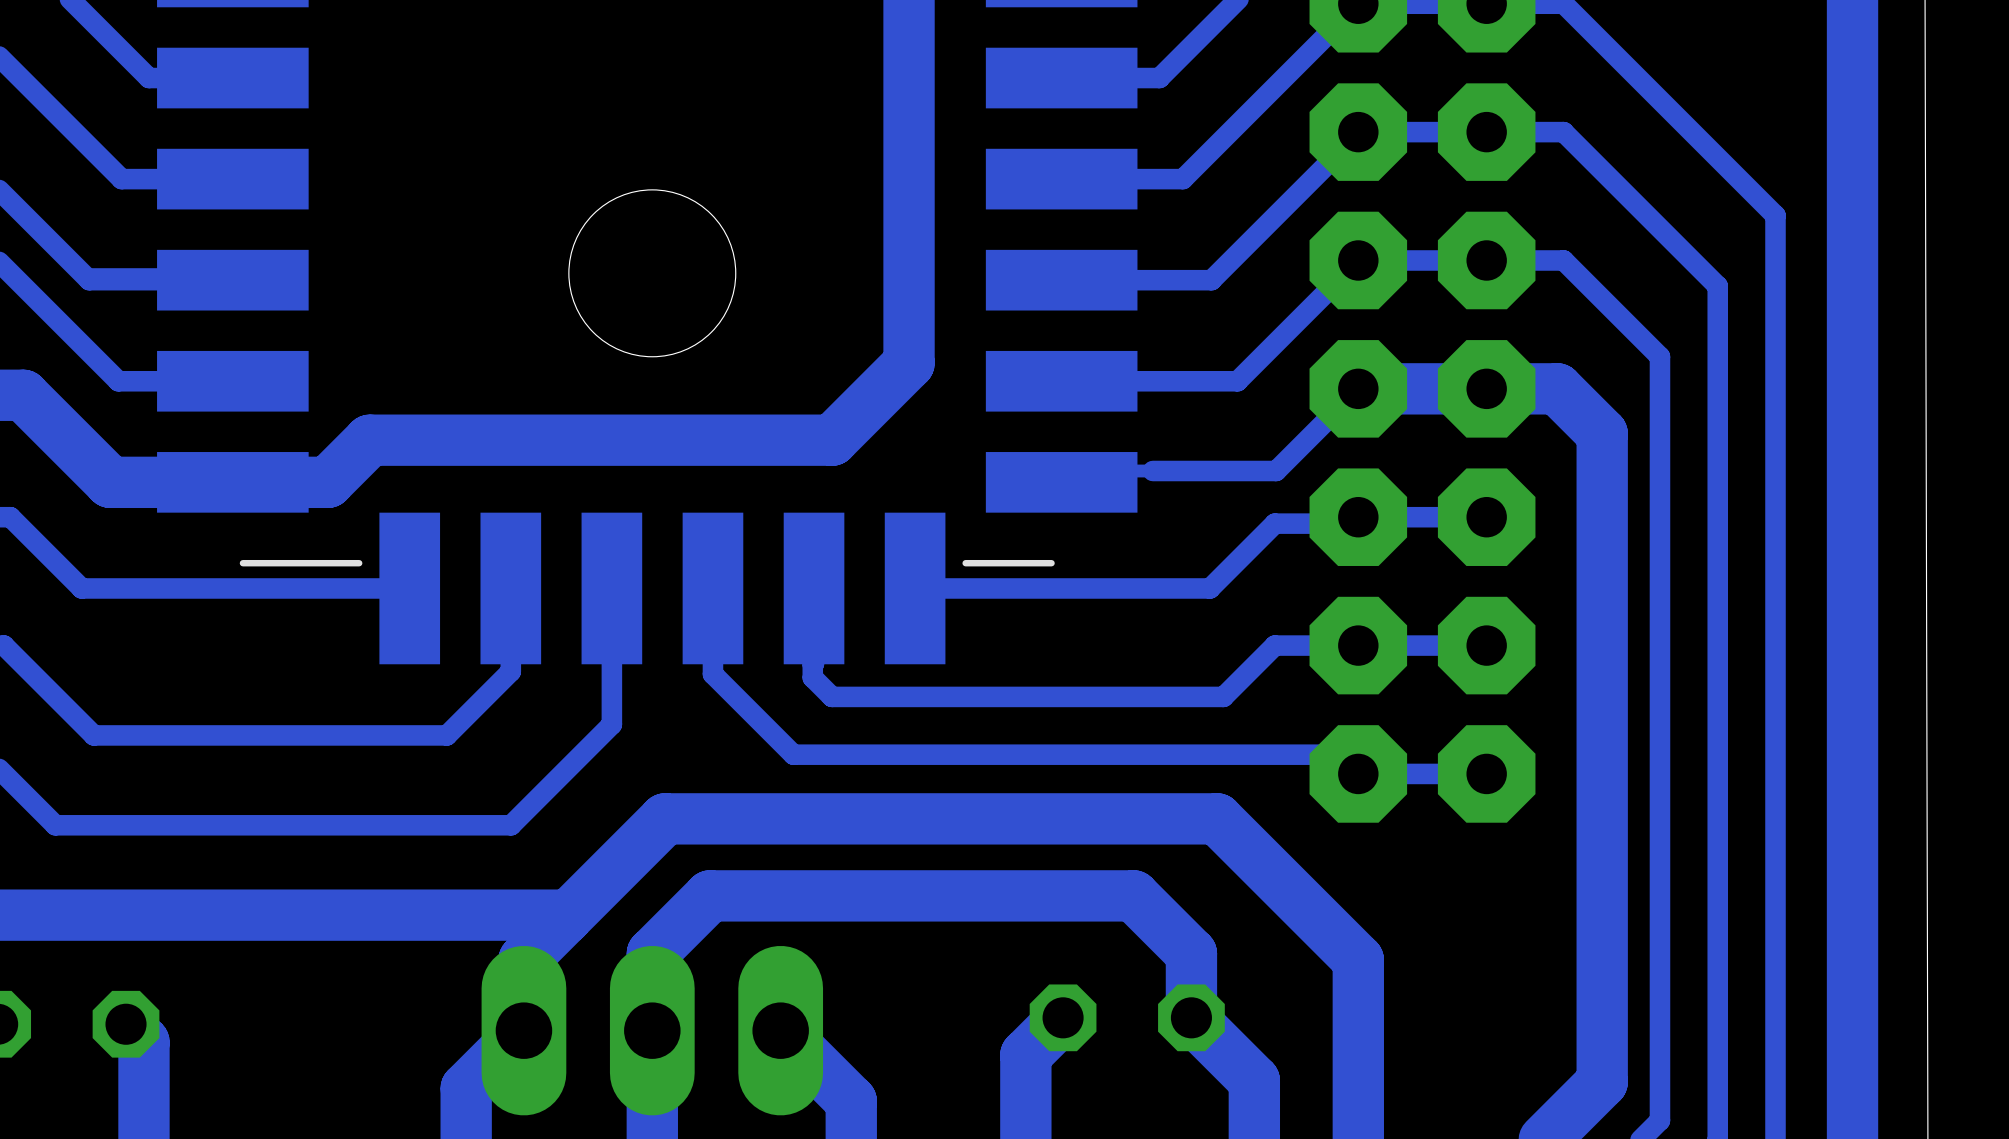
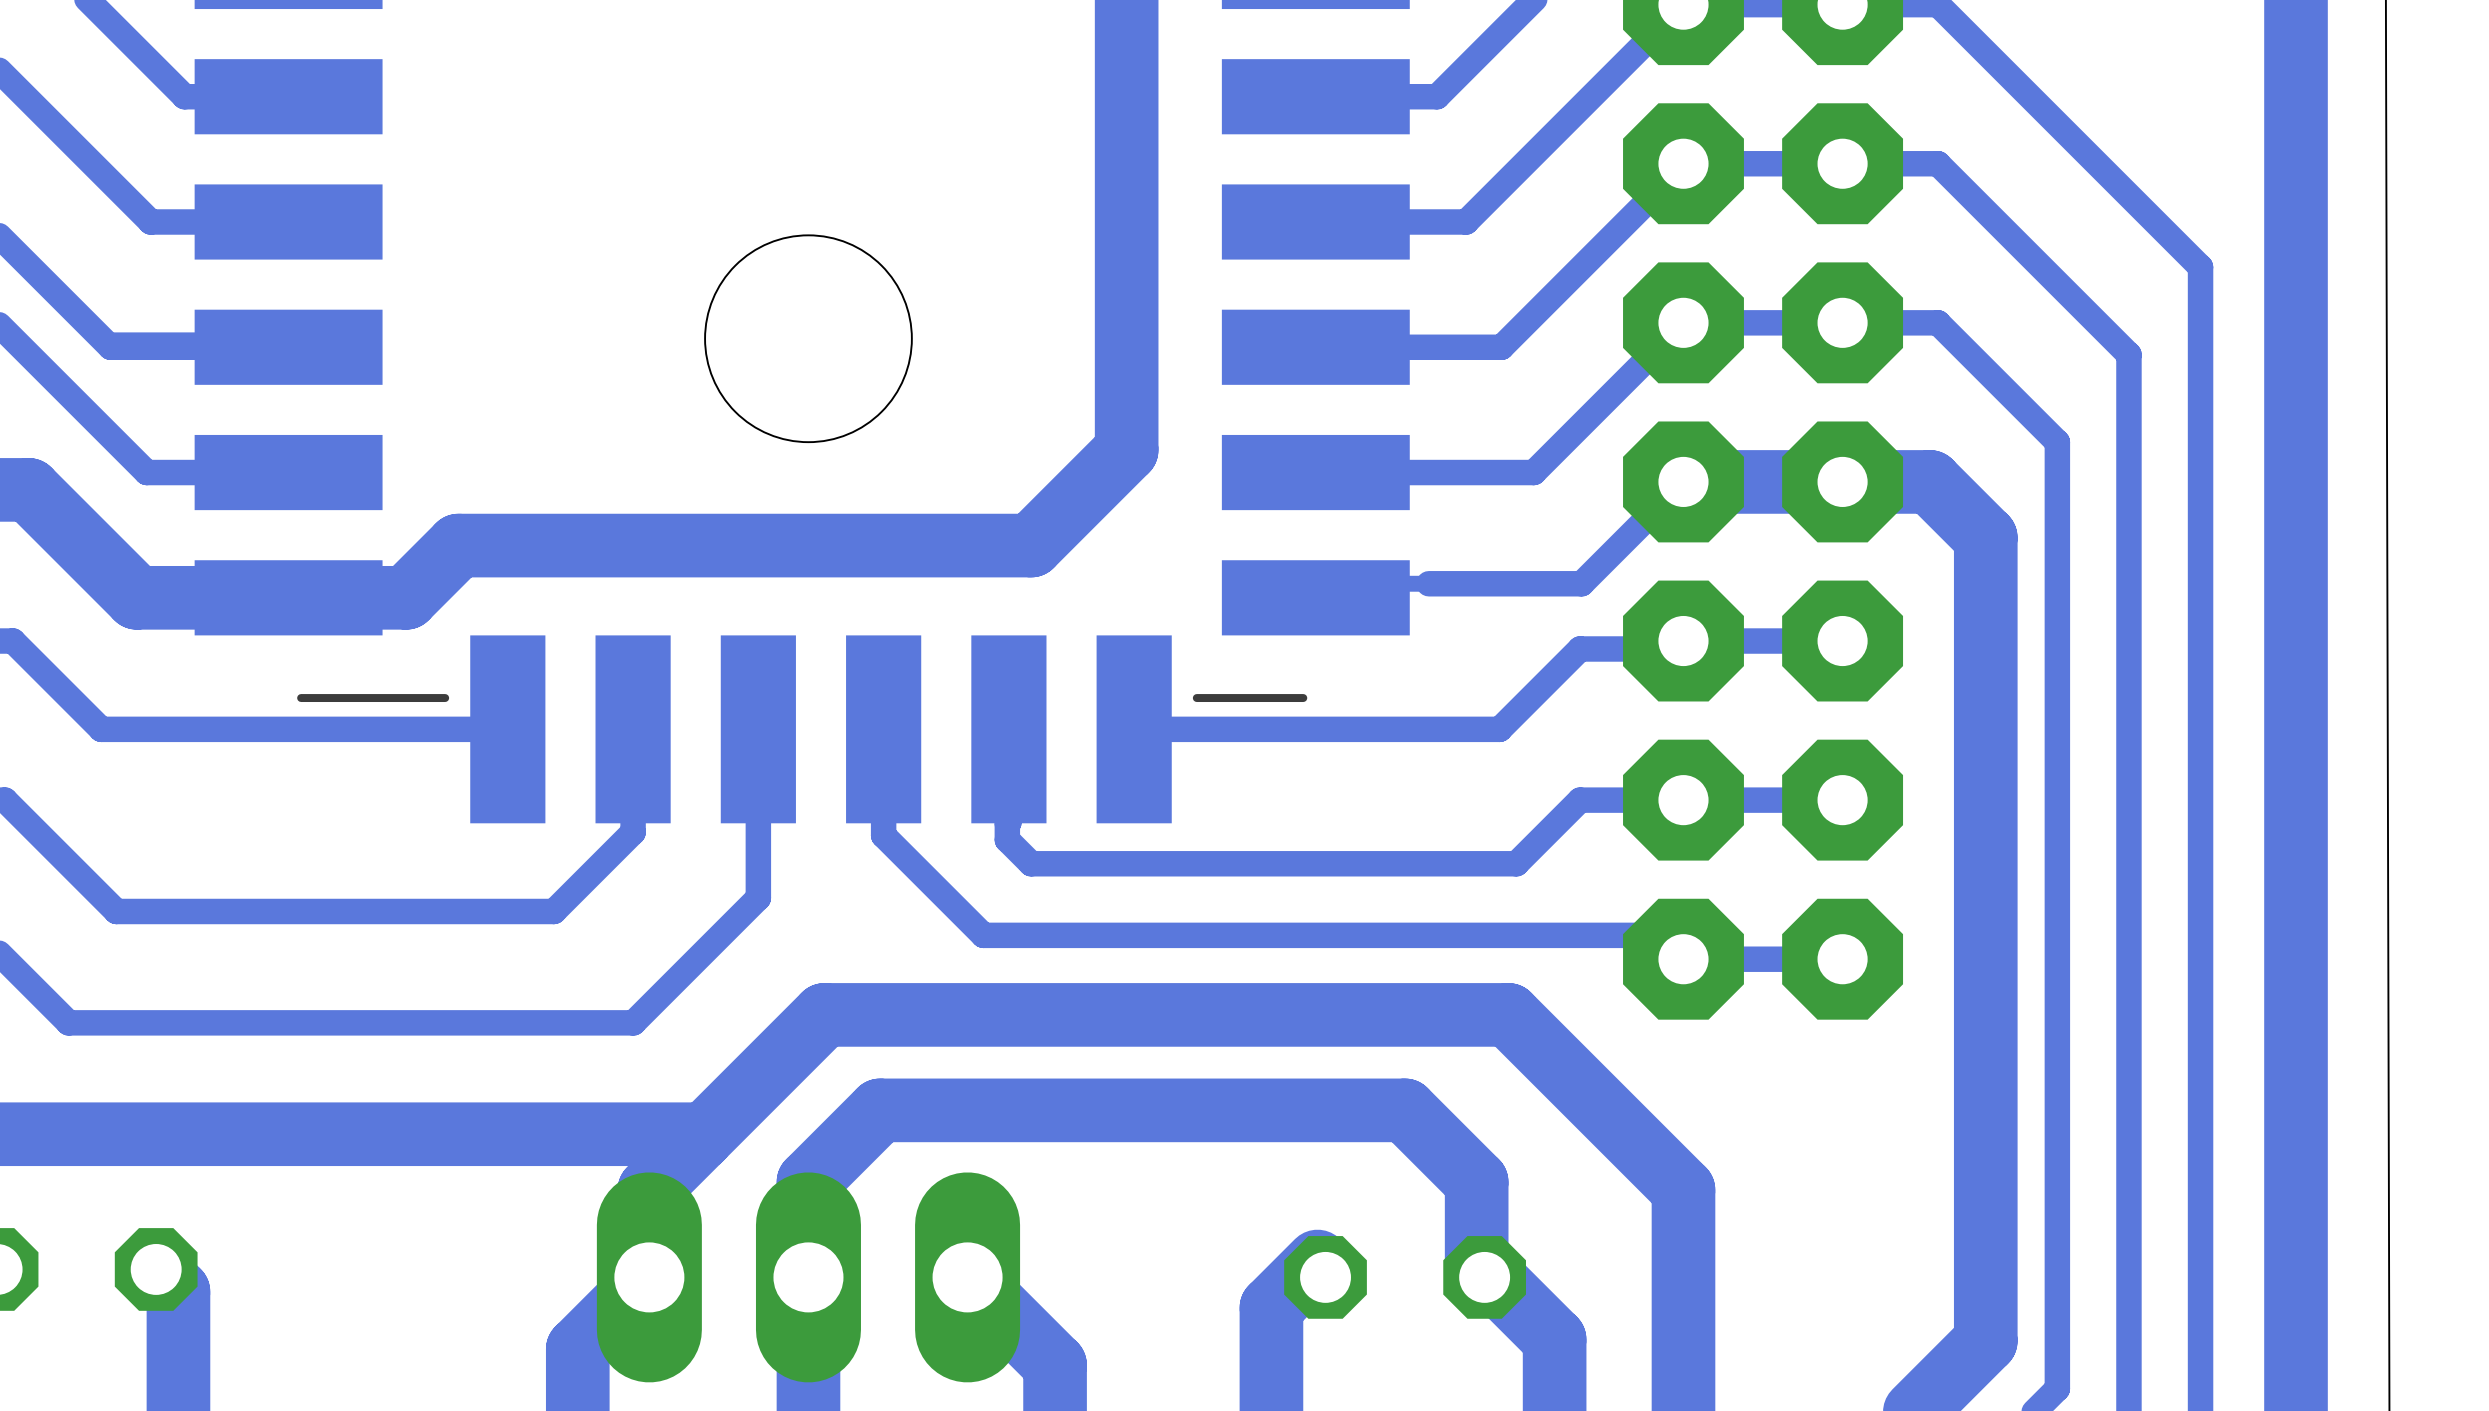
part position: (1127, 1017) -> (1405, 1277)

